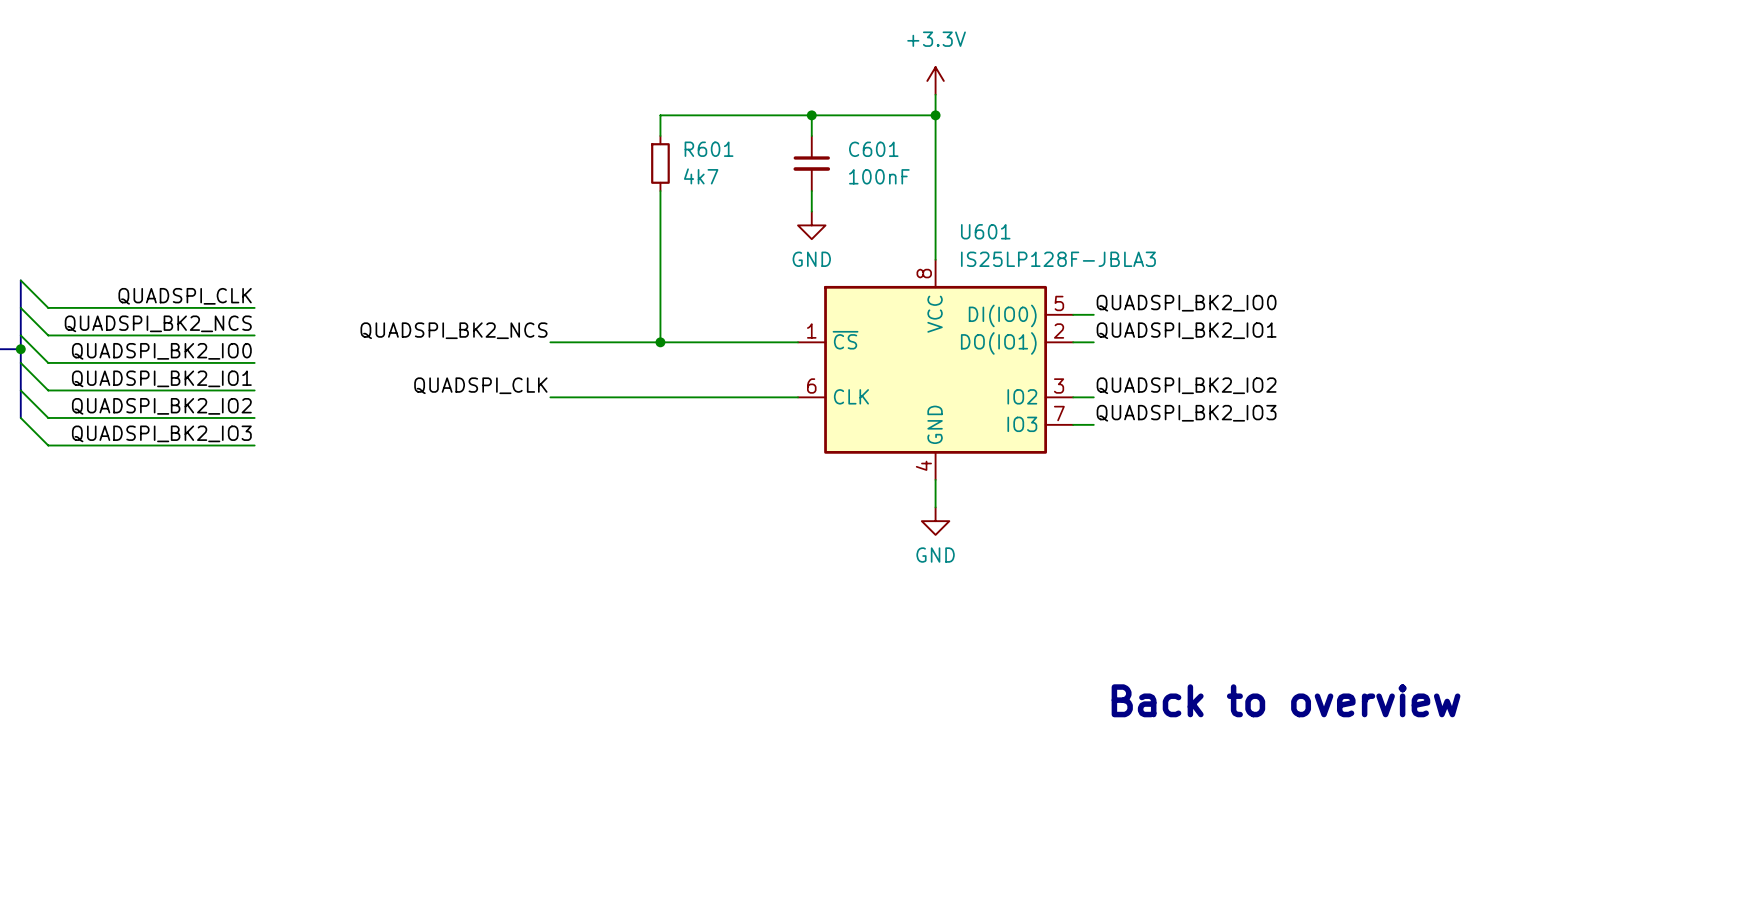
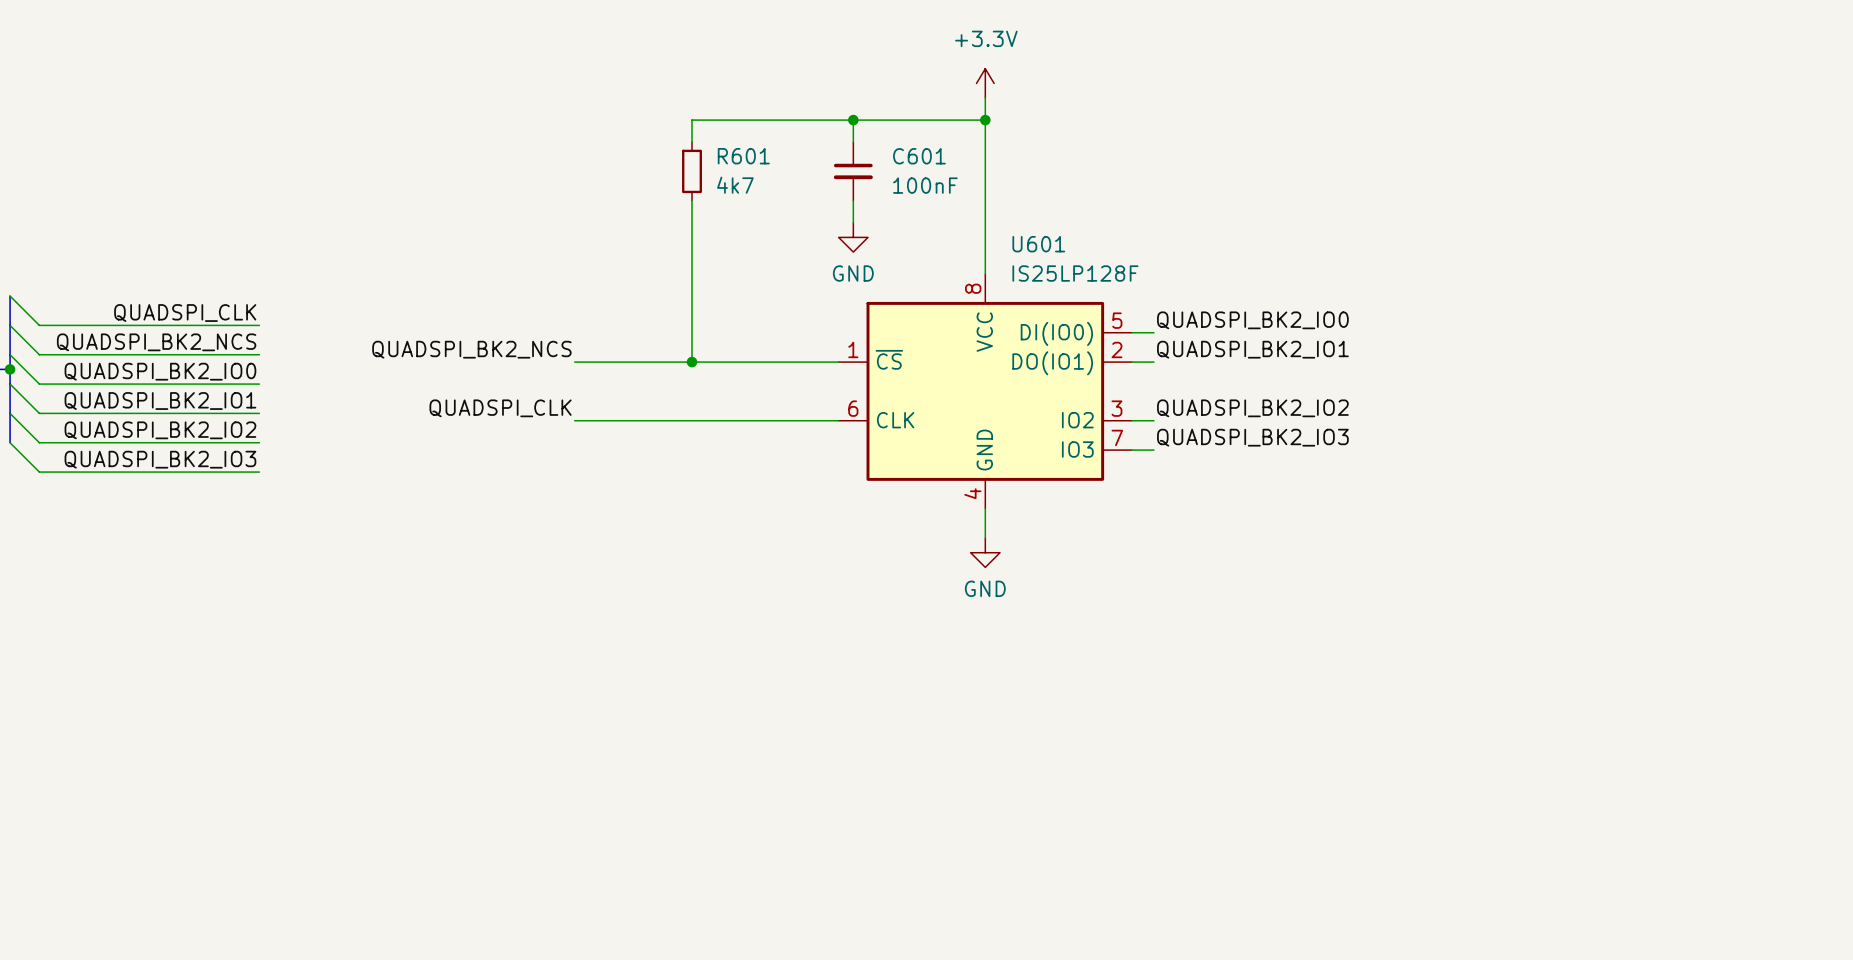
U601 value: IS25LP128F-JBLA3 (1058, 259) -> IS25LP128F (1075, 273)
text: Back to overview (1286, 700) -> none

